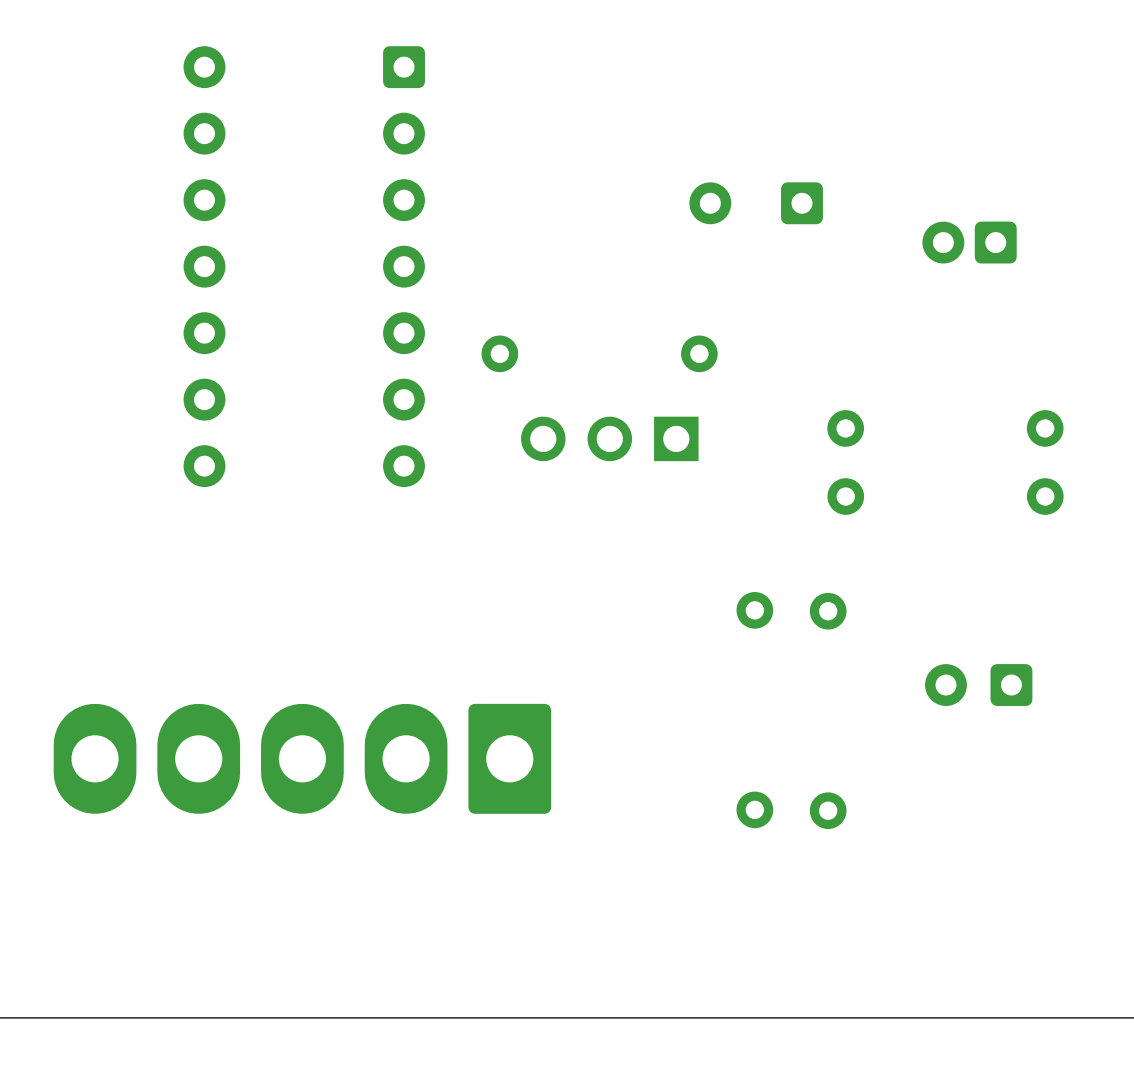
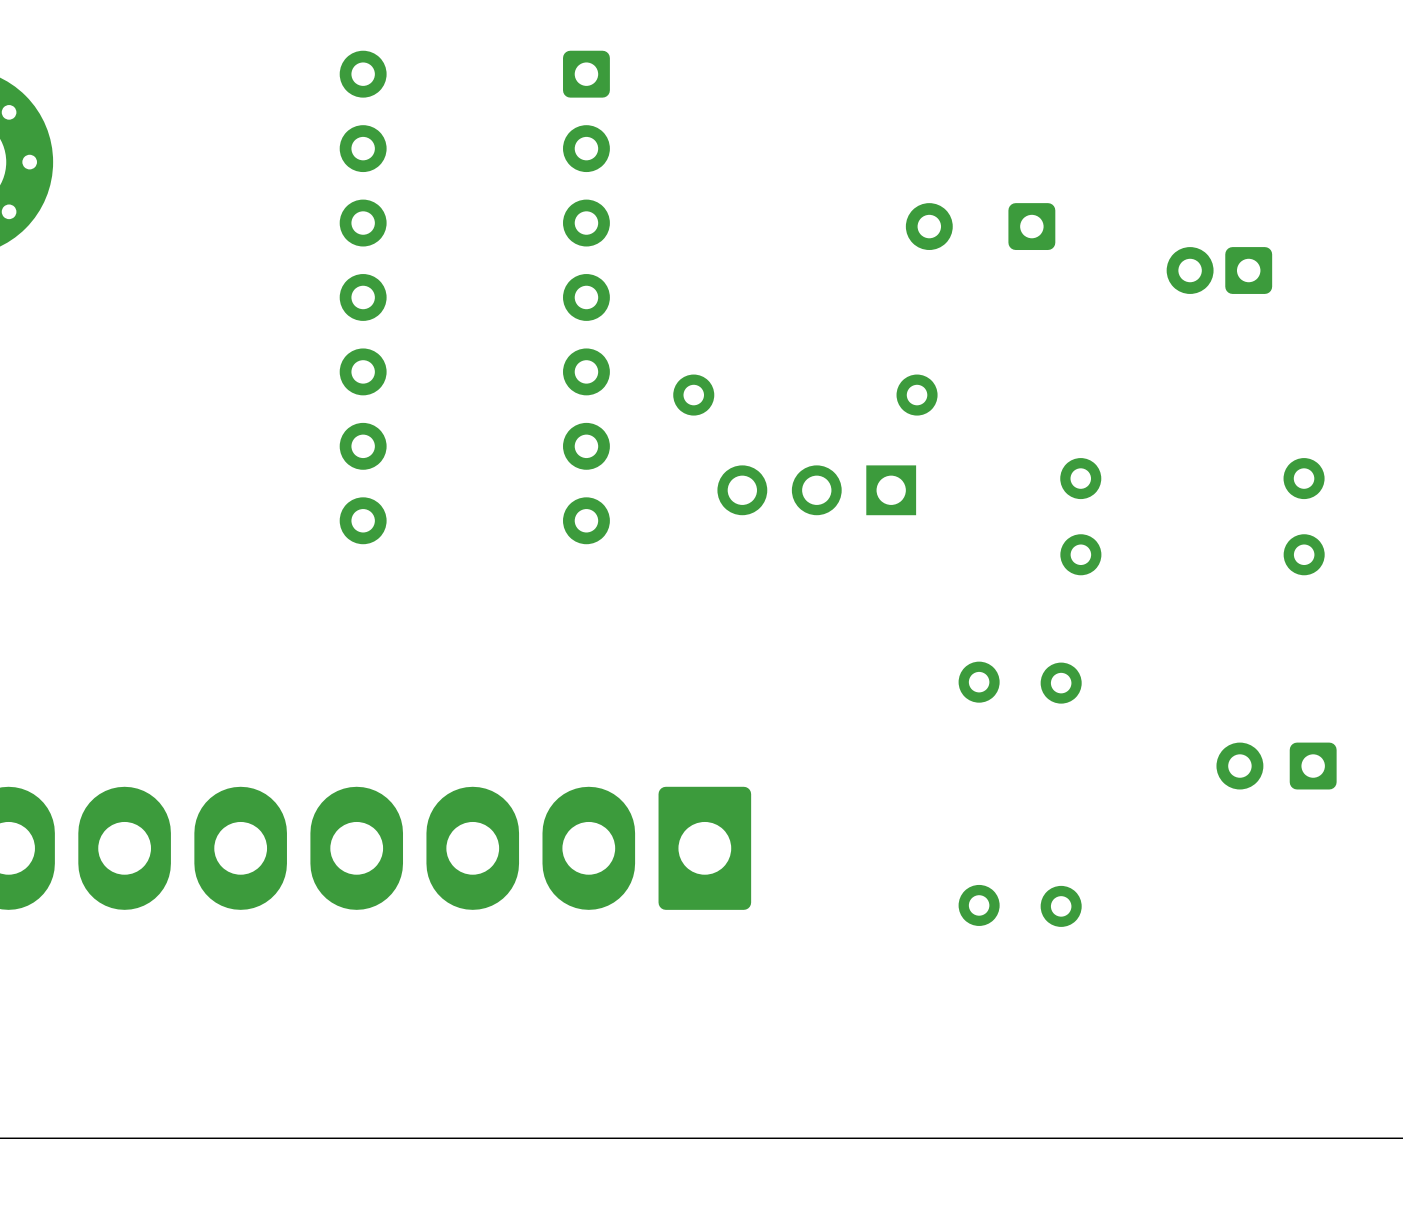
part position: (978, 685) -> (1276, 766)

